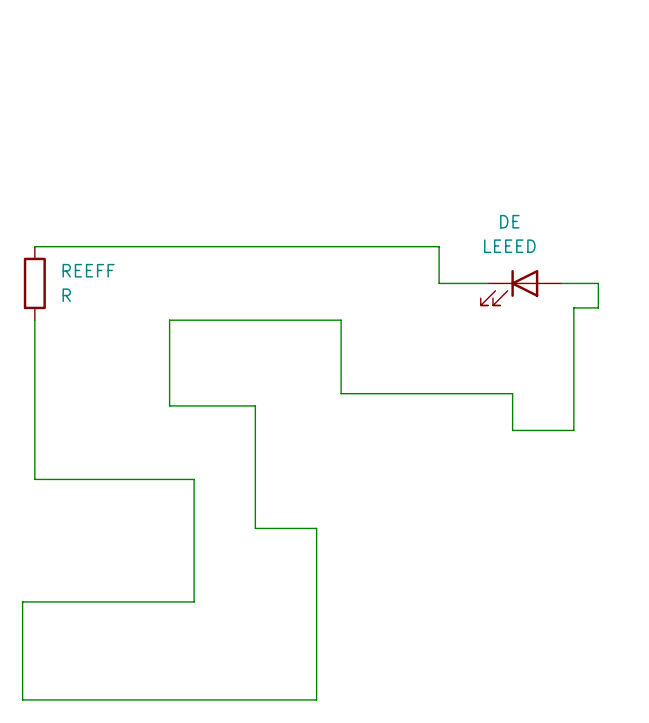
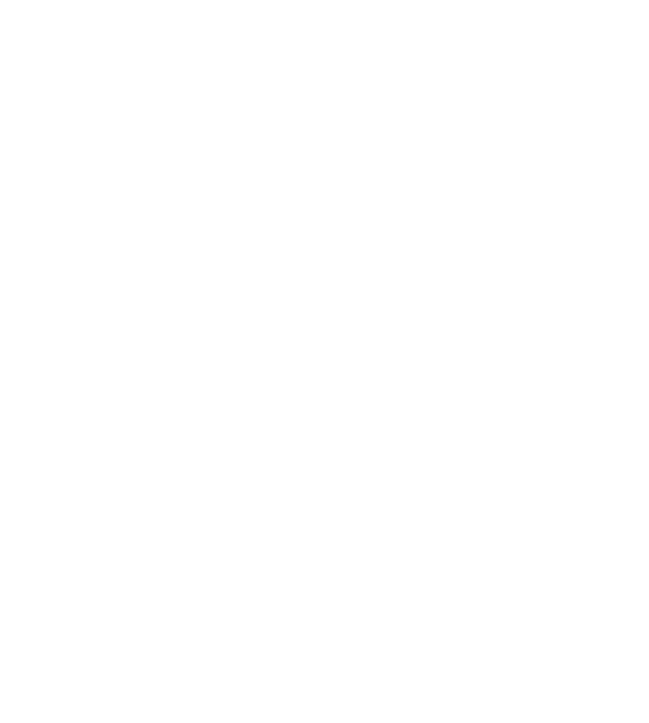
wire: (34, 246) (439, 246) (439, 283) (488, 283) -> none
REEFF: R (34, 283) -> none
wire: (561, 283) (598, 283) (598, 307) (573, 307) (573, 430) (512, 430) (512, 393) (341, 393) (341, 320) (169, 320) (169, 405) (255, 405) (255, 528) (316, 528) (316, 699) (22, 699) (22, 601) (194, 601) (194, 479) (34, 479) (34, 320) -> none
DE: LEEED (521, 287) -> none

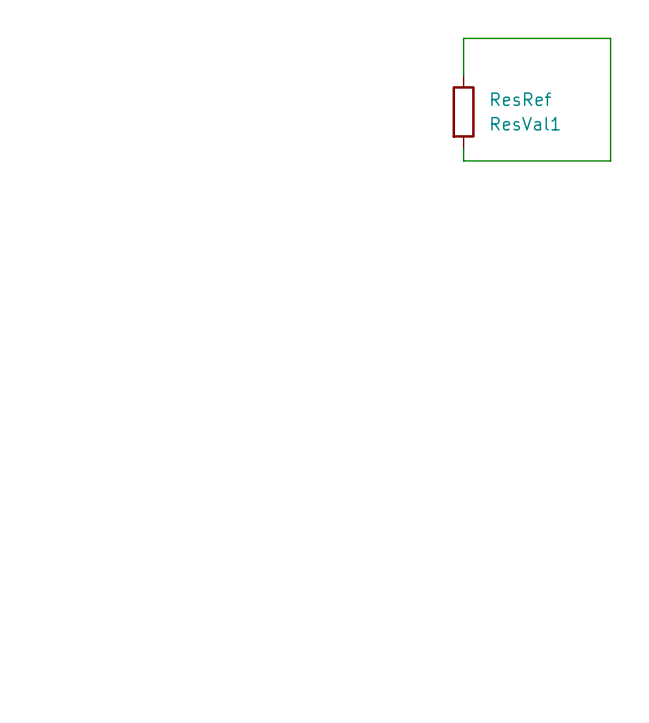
wire: none -> (463, 75) (463, 38) (610, 38) (610, 160) (463, 160) (463, 148)
ResRef: none -> ResVal1 (463, 111)

